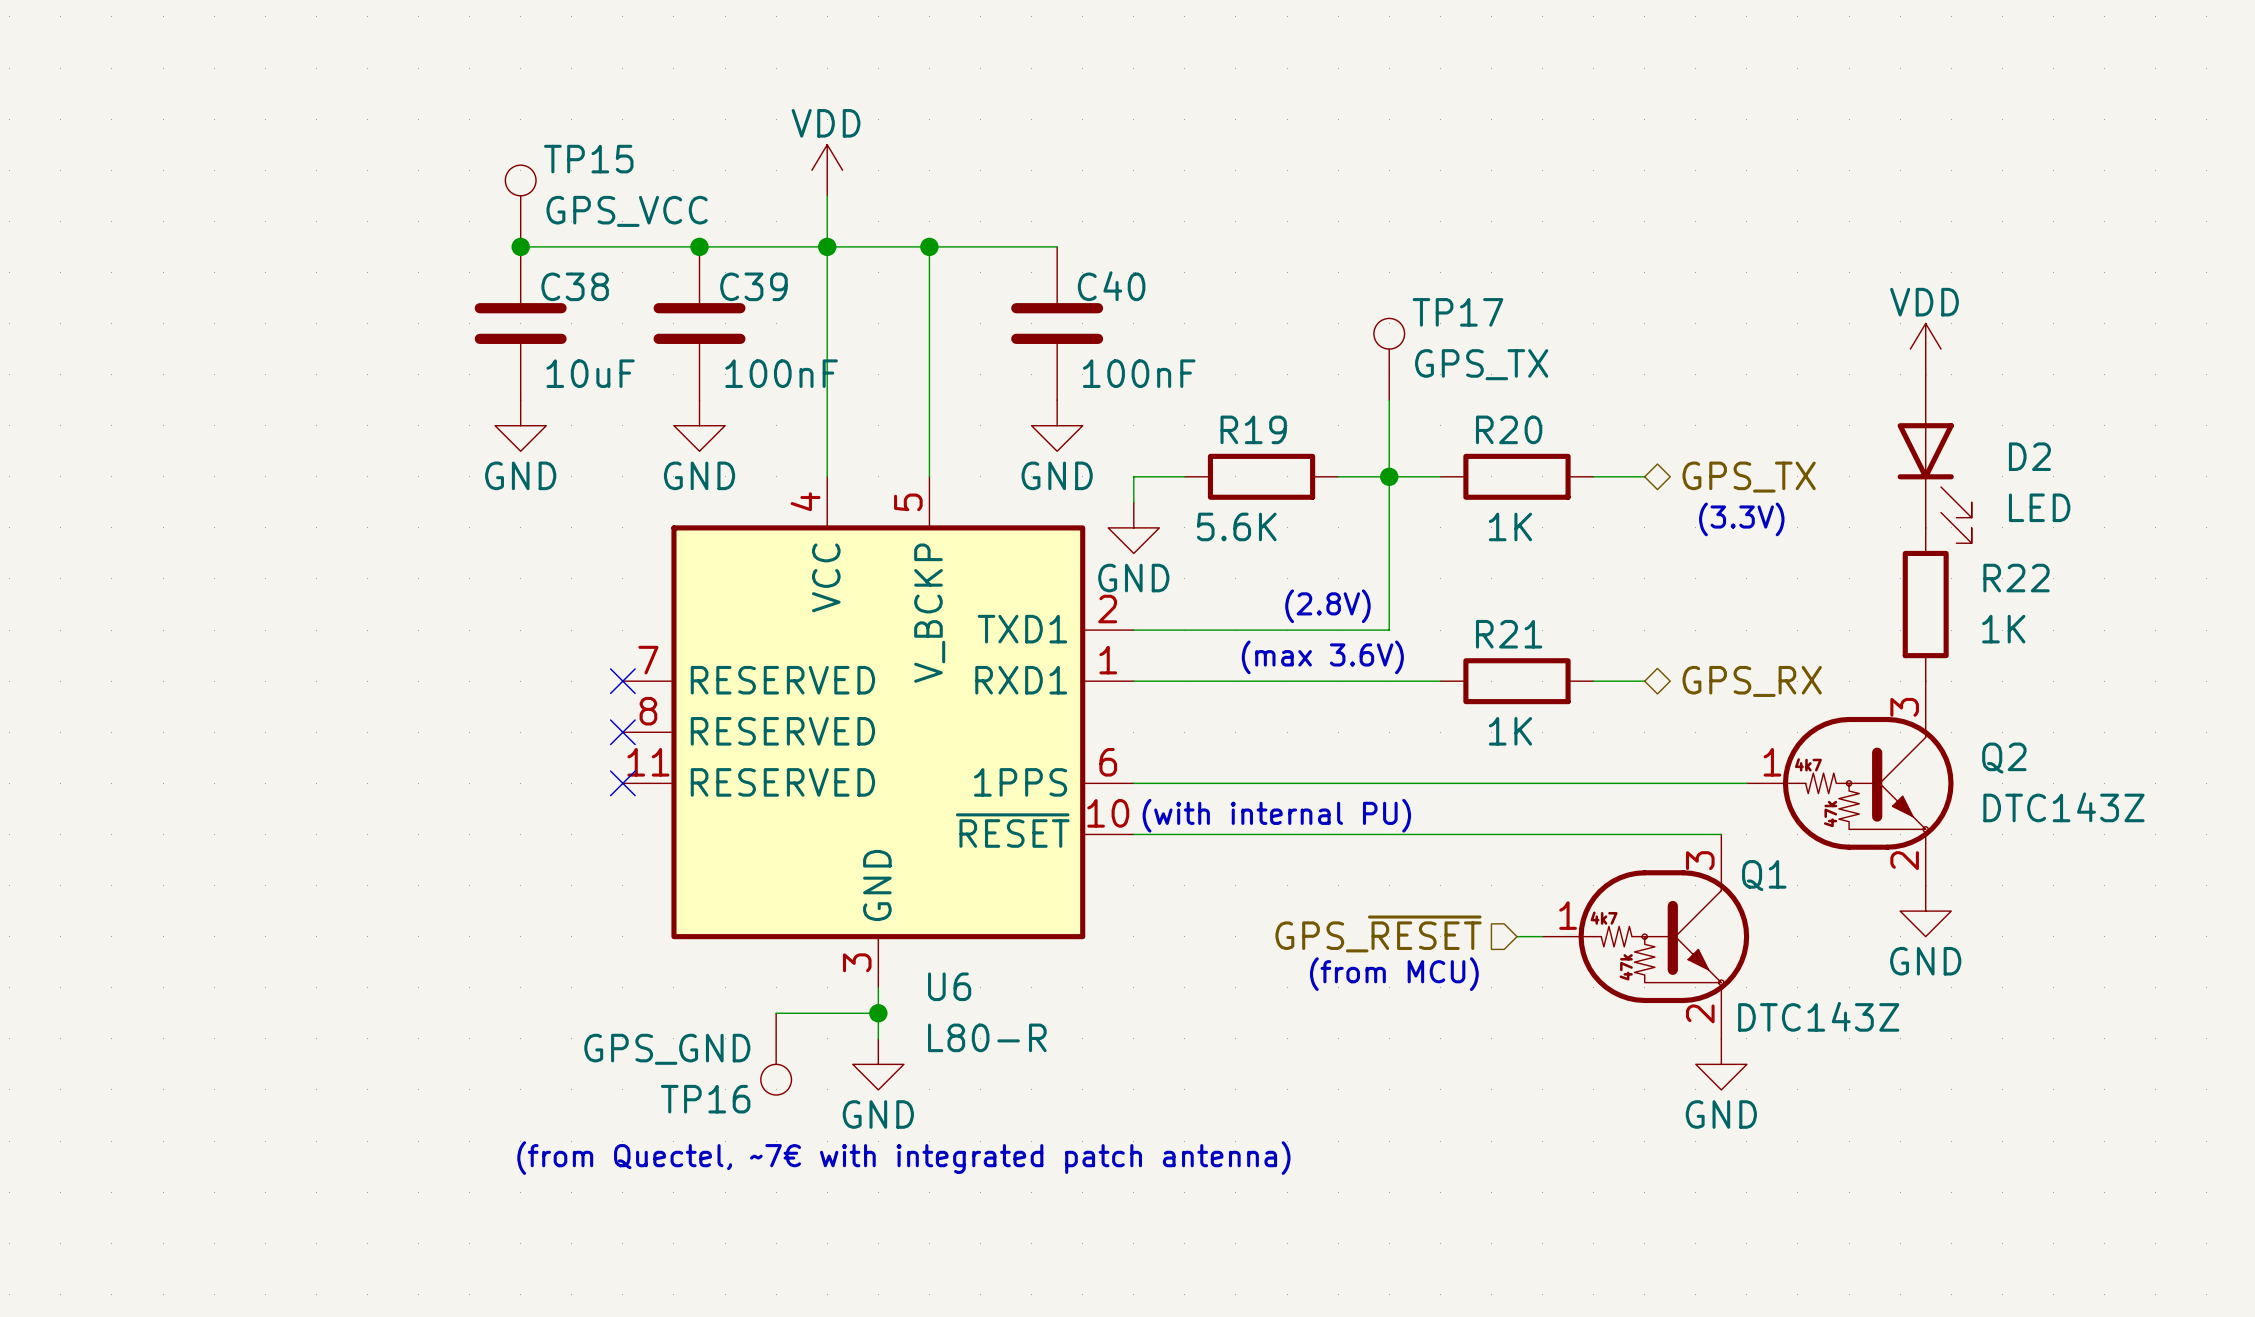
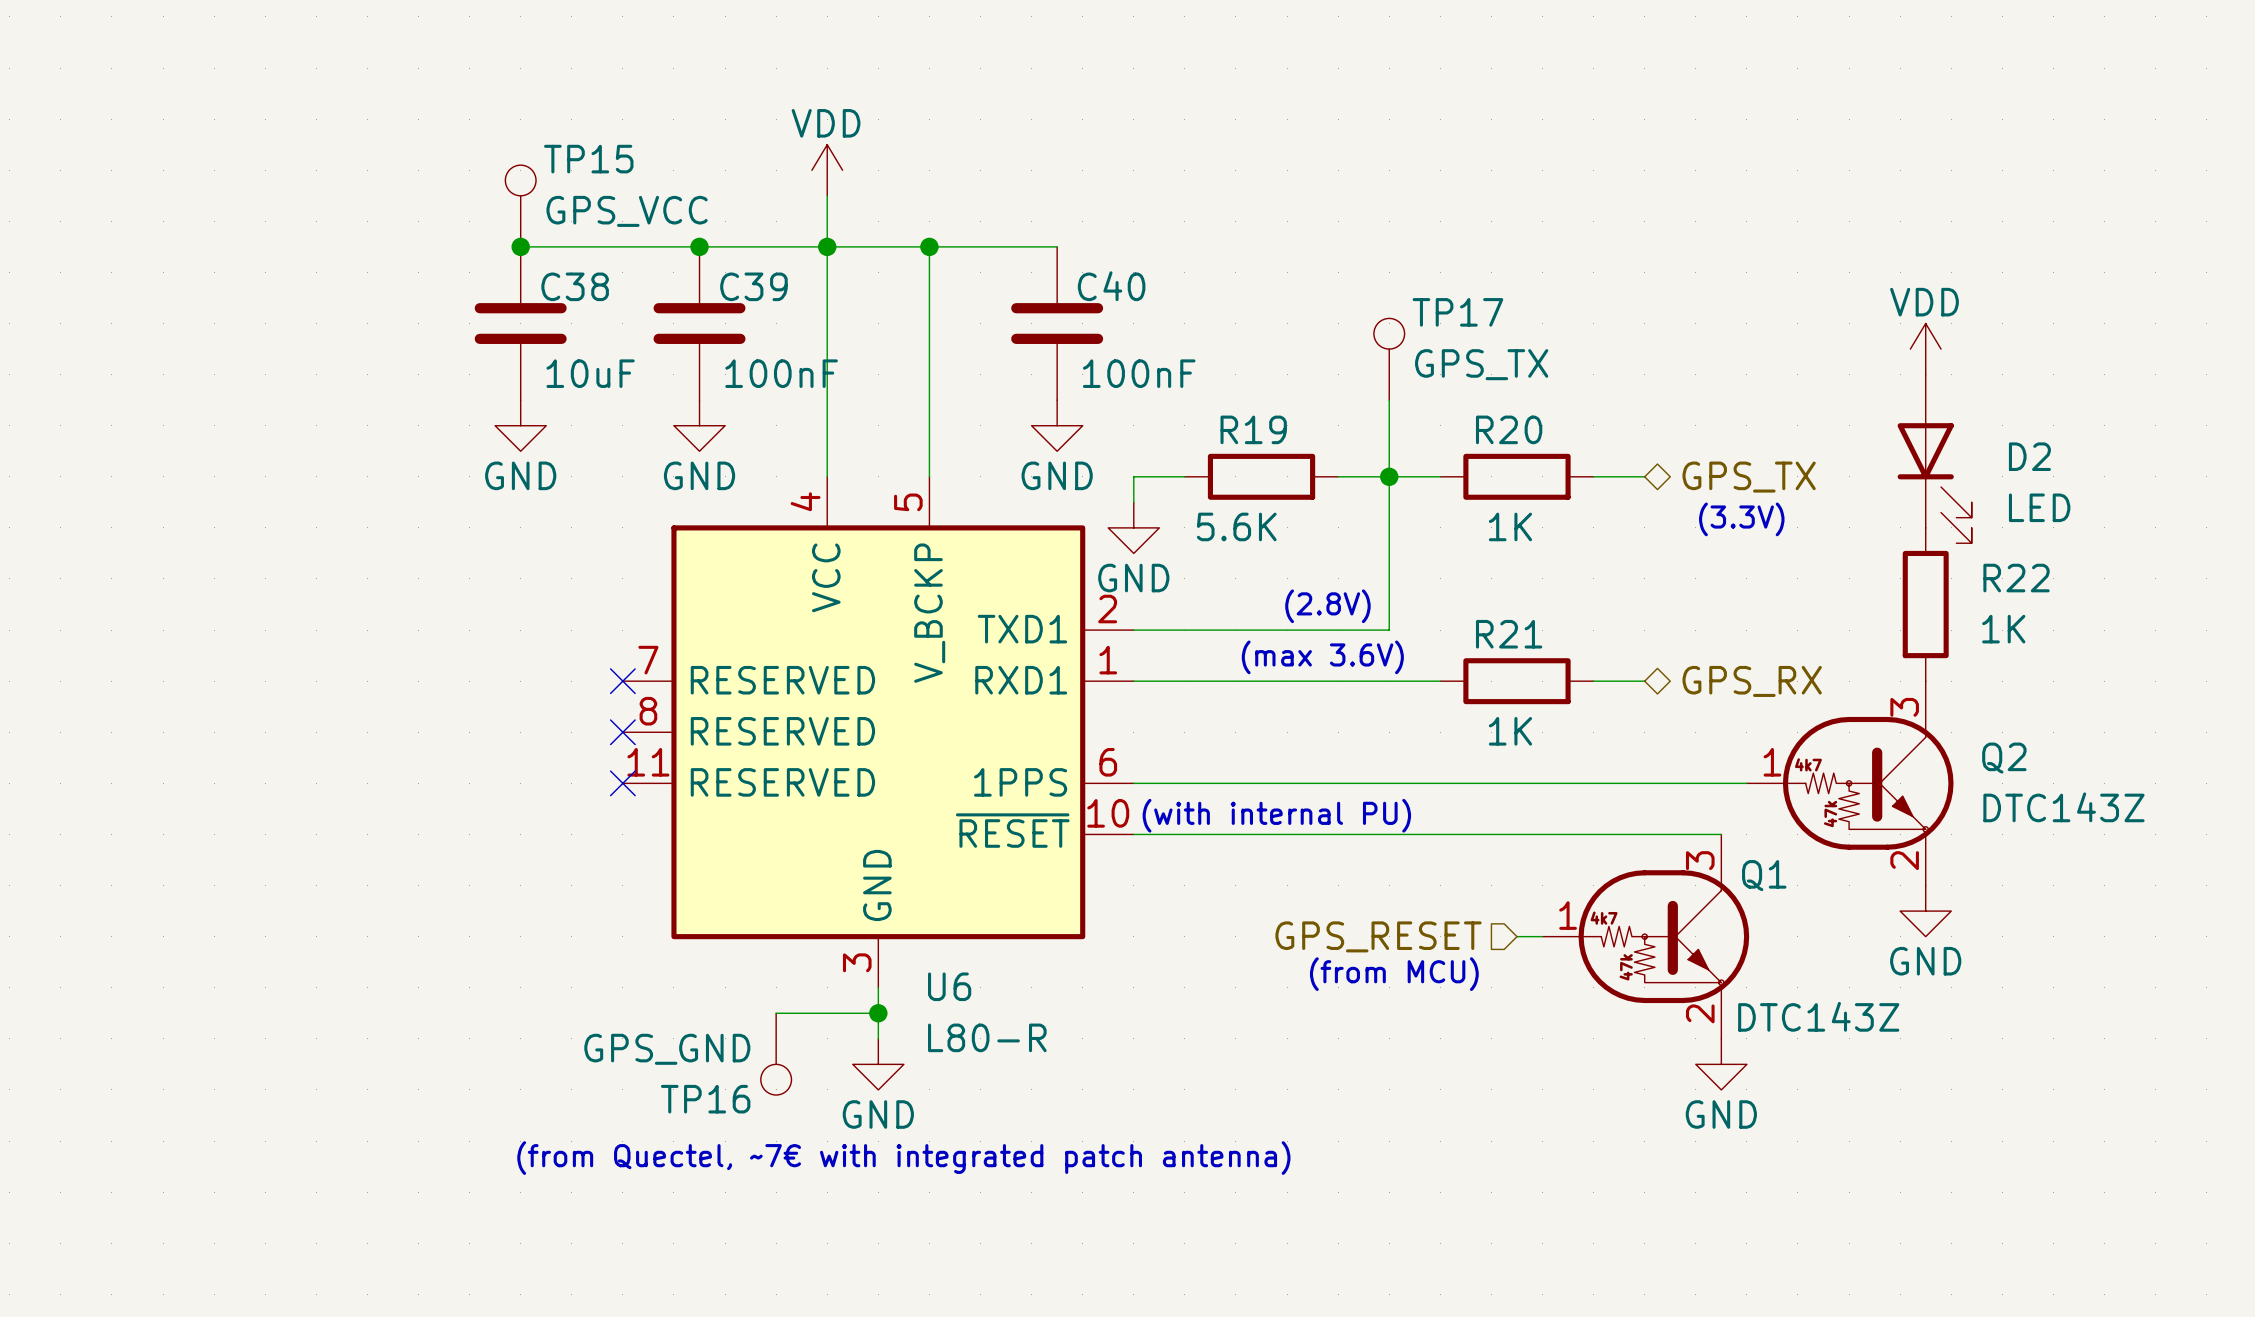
hierarchical label: GPS_~{RESET} (1378, 933) -> GPS_RESET (1378, 936)

